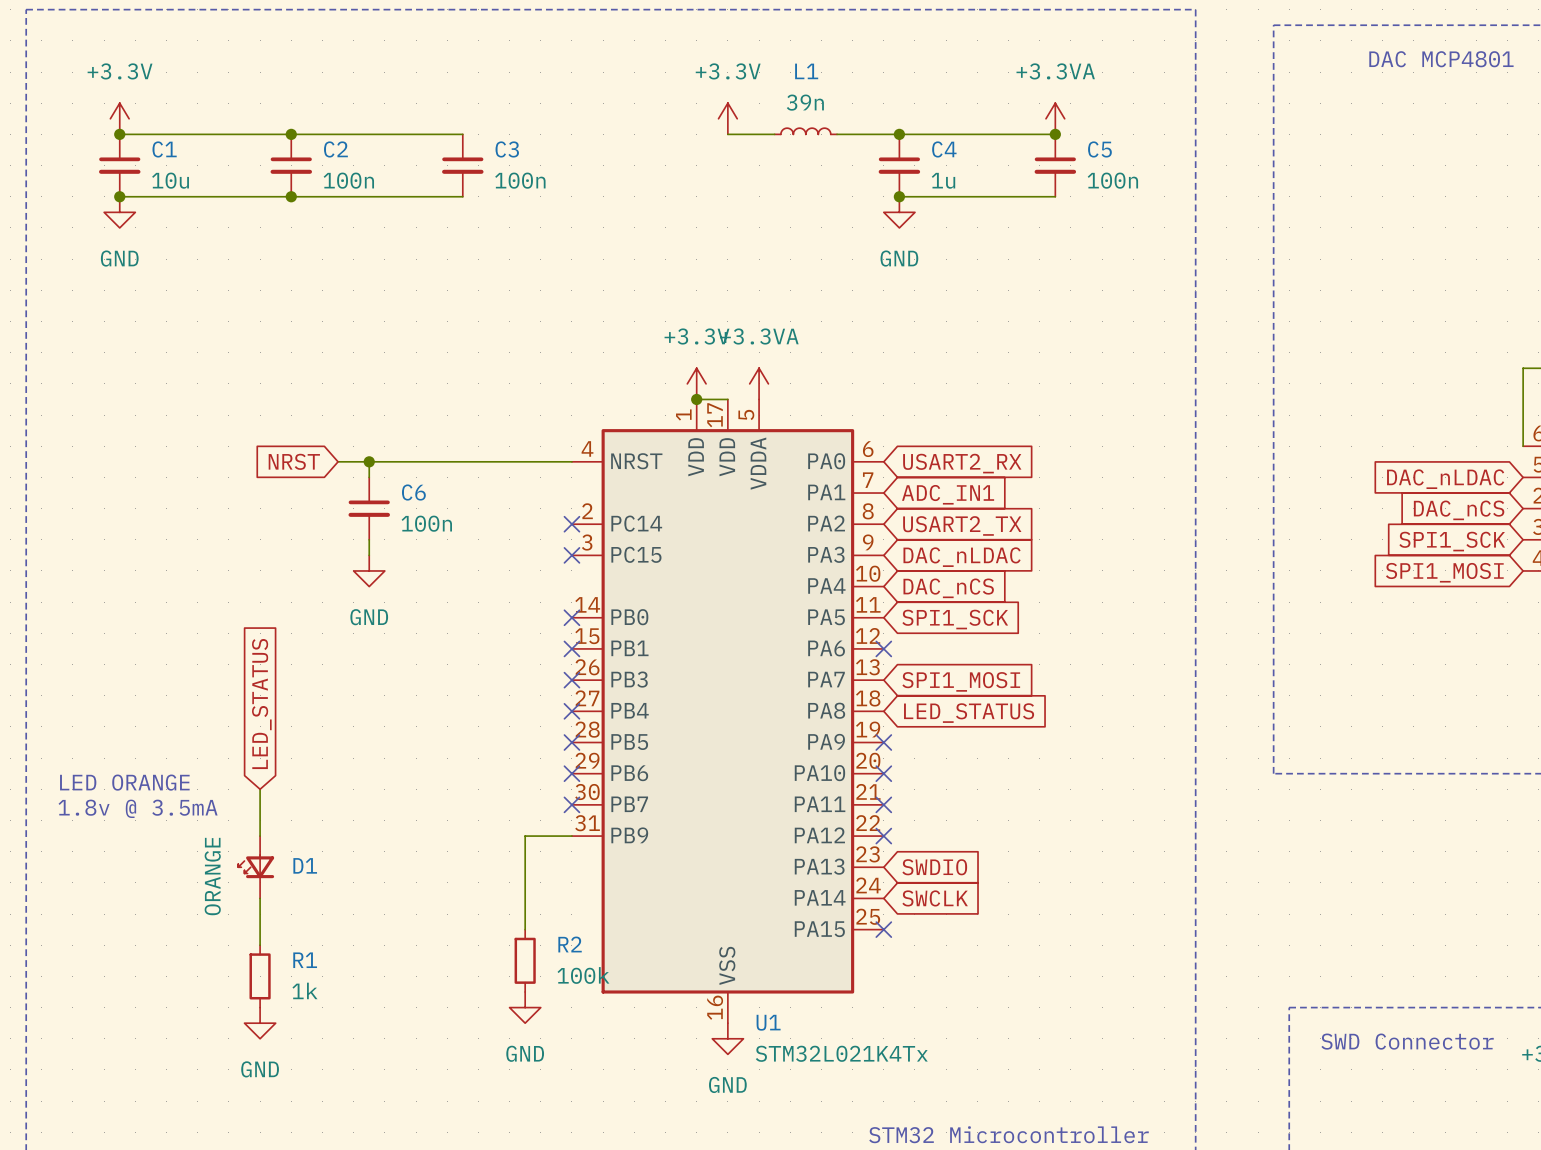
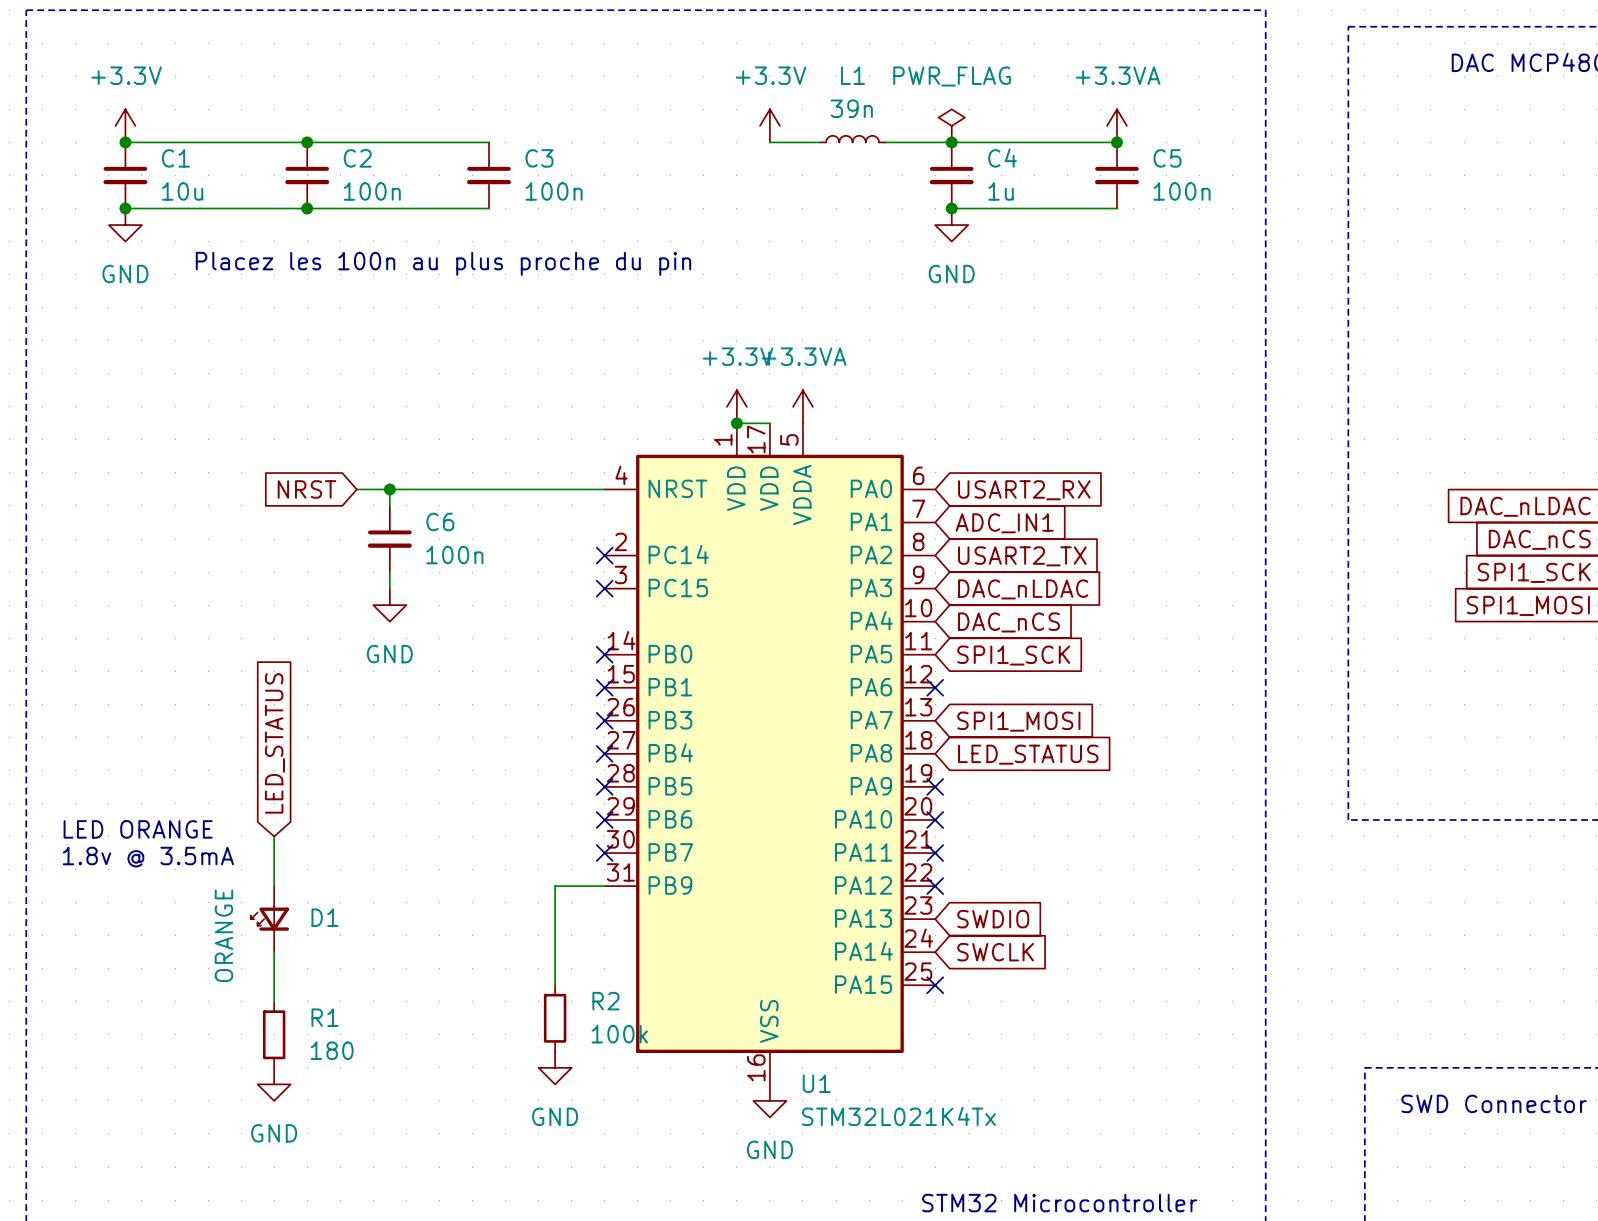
power symbol: none -> PWR_FLAG (951, 125)
text: none -> Placez les 100n au plus proche du pin (443, 263)
R1 value: 1k (304, 990) -> 180 (332, 1050)

